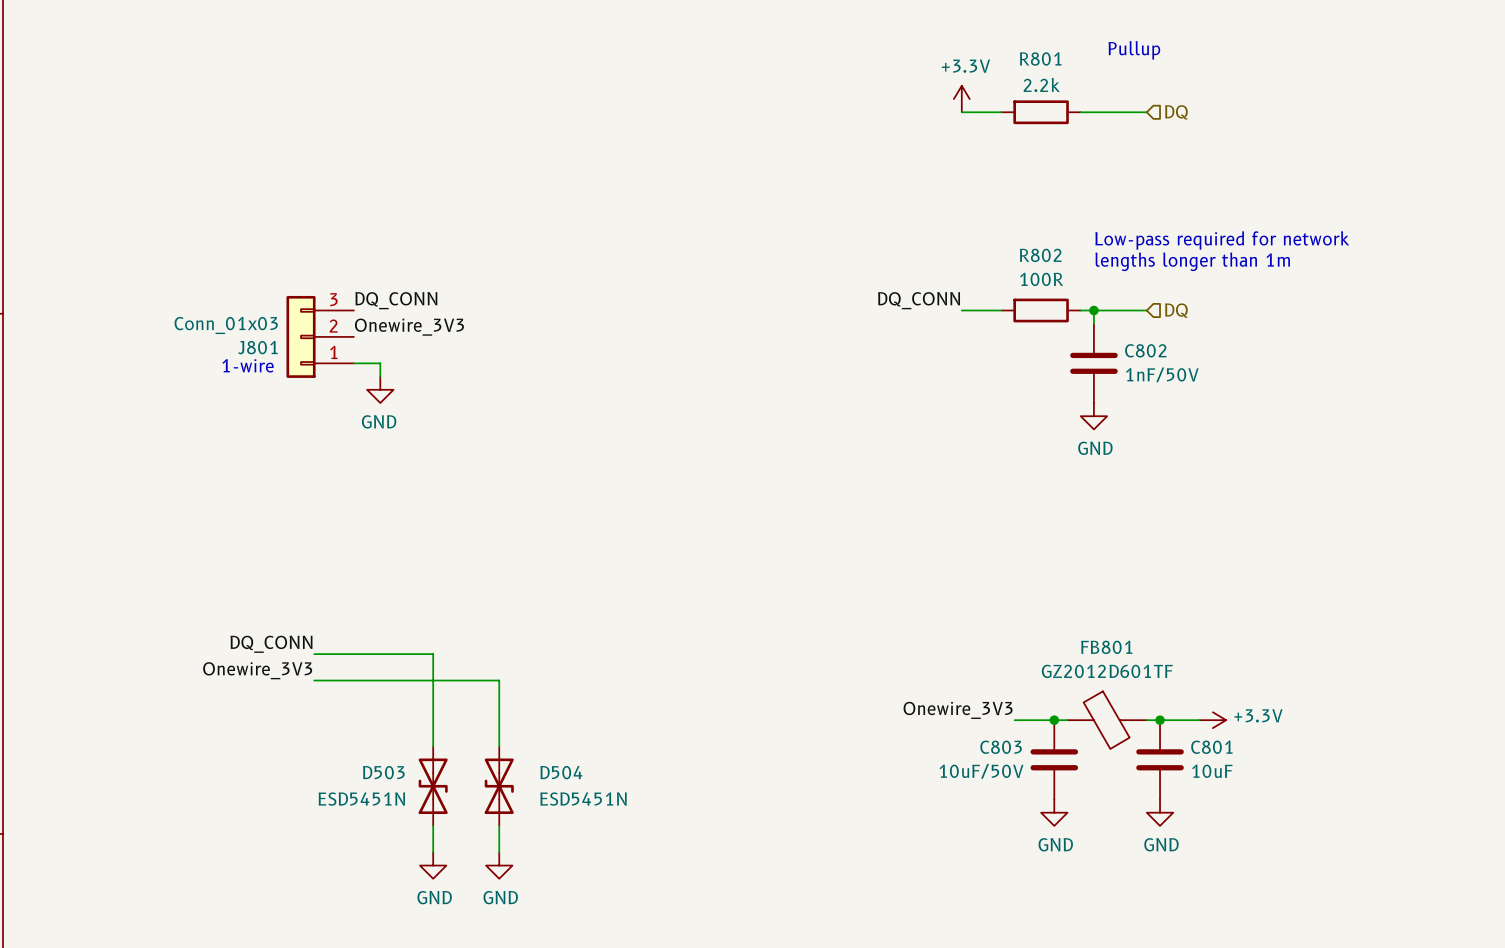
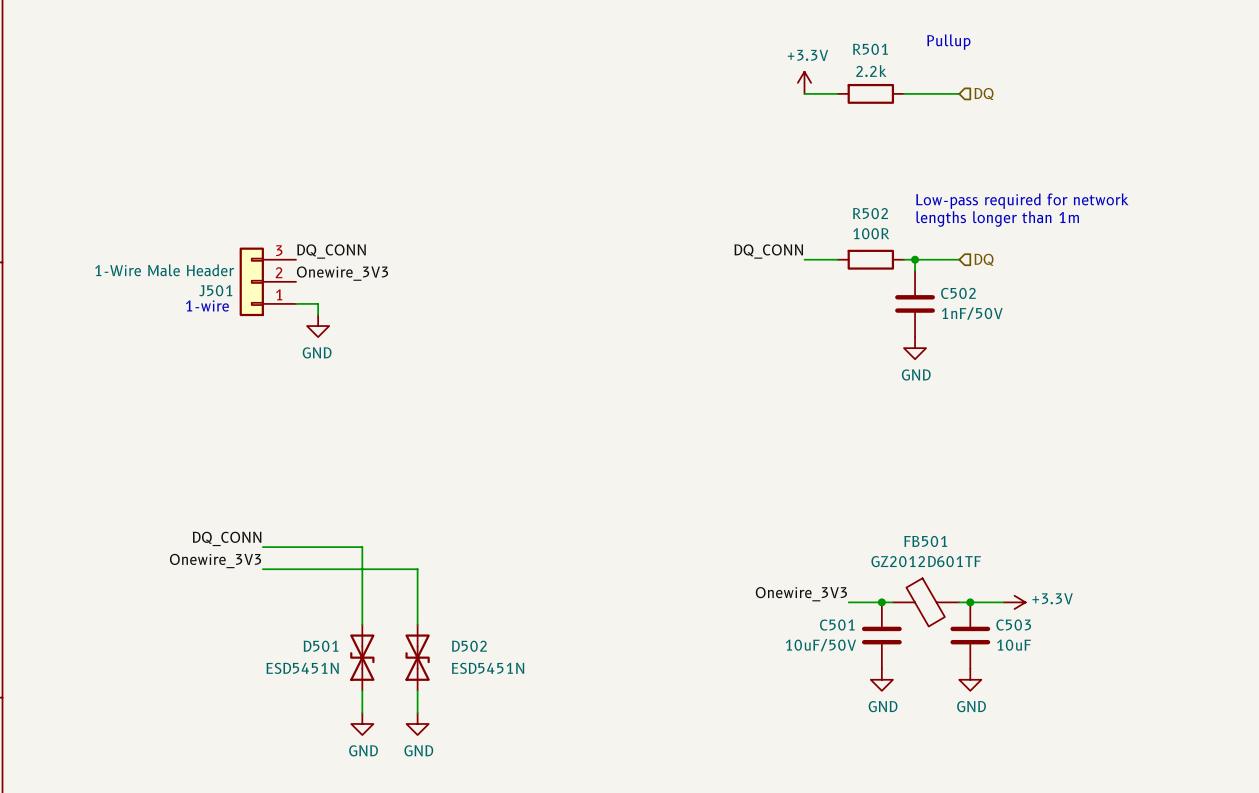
R801 name: R801 (1040, 58) -> R501 (870, 49)
R802 name: R802 (1040, 255) -> R502 (870, 213)
J801 value: Conn_01x03 (226, 325) -> 1-Wire Male Header (164, 270)
J801 name: J801 (257, 347) -> J501 (215, 290)
C802 name: C802 (1145, 350) -> C502 (958, 293)
FB801 name: FB801 (1106, 647) -> FB501 (925, 541)
C803 name: C803 (1001, 747) -> C501 (837, 625)
C801 name: C801 (1211, 747) -> C503 (1013, 625)
D503 name: D503 (383, 772) -> D501 (321, 646)
D504 name: D504 (561, 772) -> D502 (469, 646)

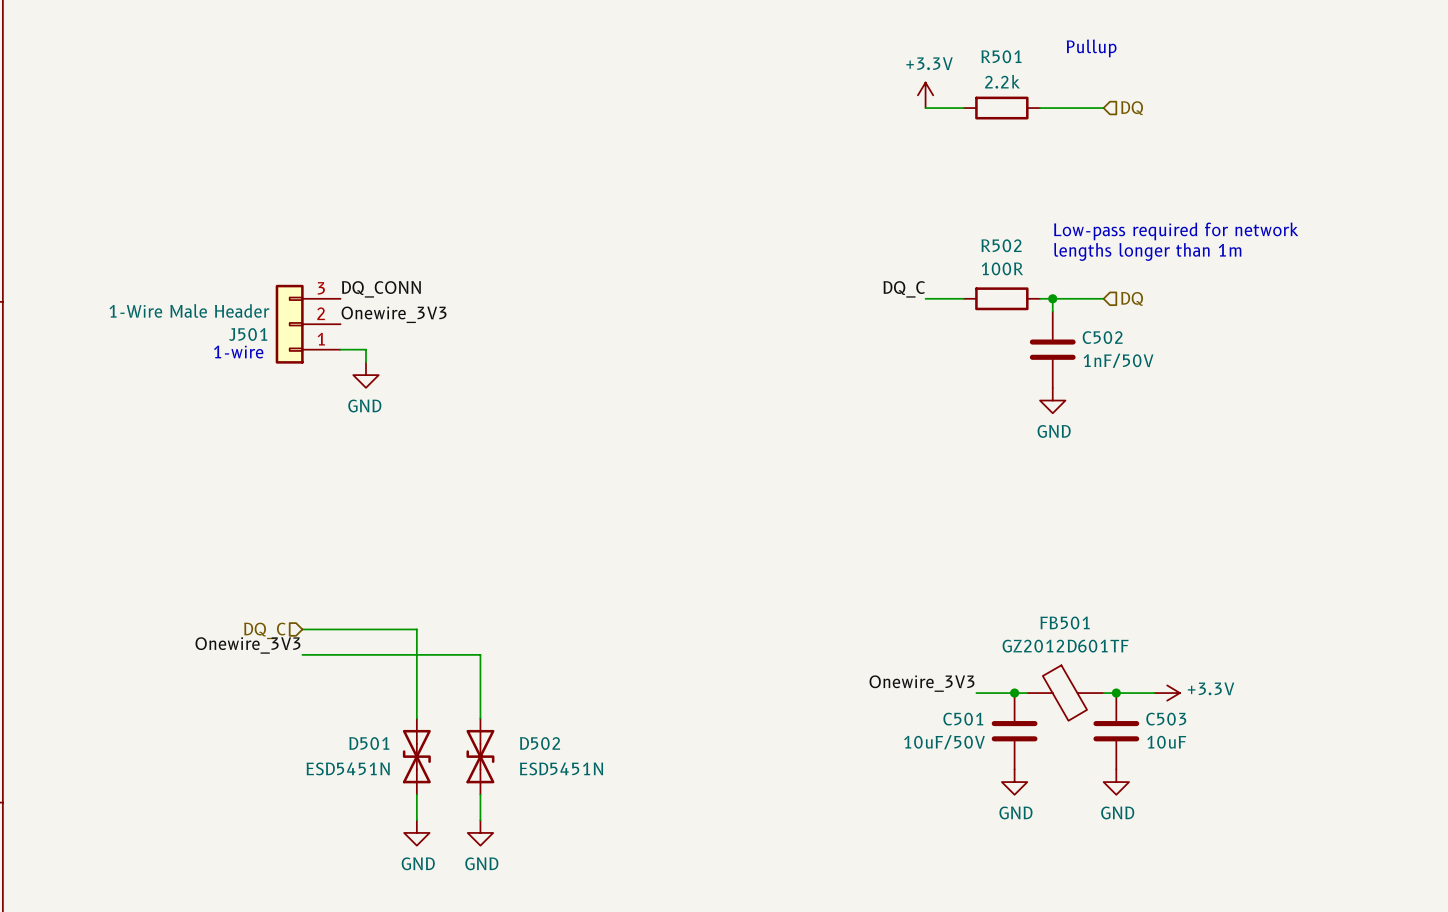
label: DQ_CONN (768, 251) -> DQ_C (904, 289)
label: DQ_CONN (227, 538) -> none
hierarchical label: none -> DQ_C (264, 630)

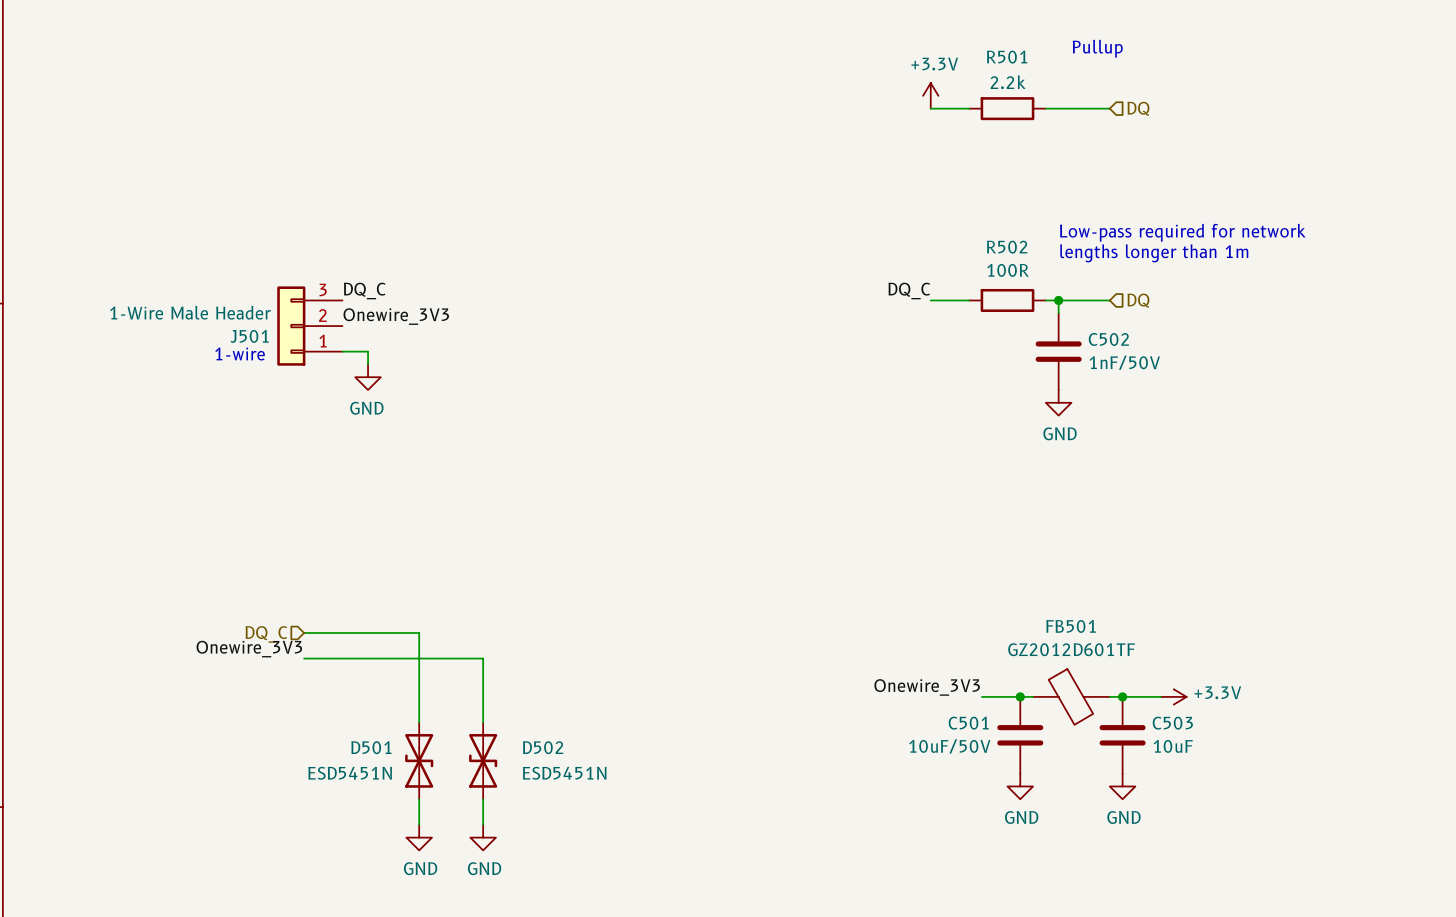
label: DQ_CONN (381, 289) -> DQ_C (364, 290)

